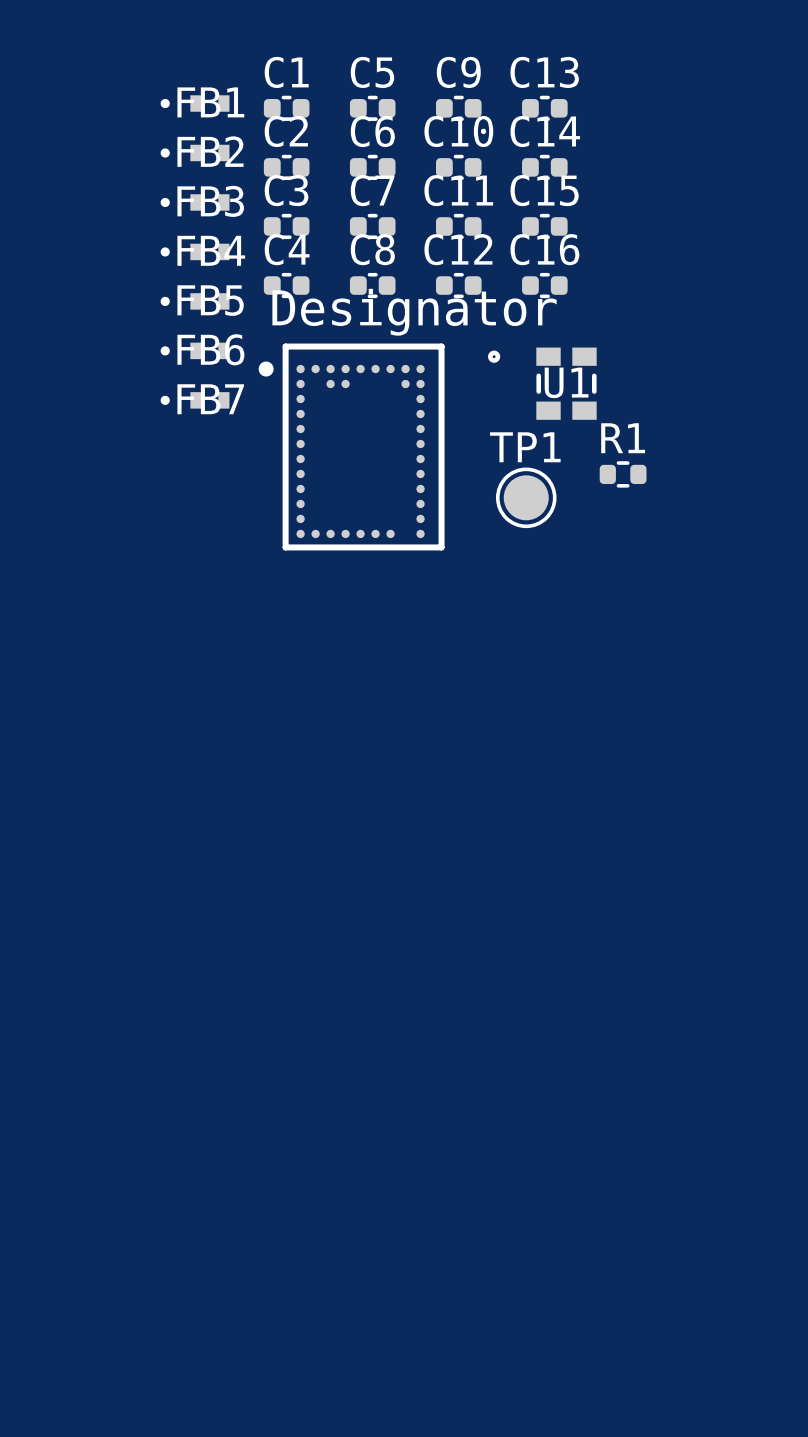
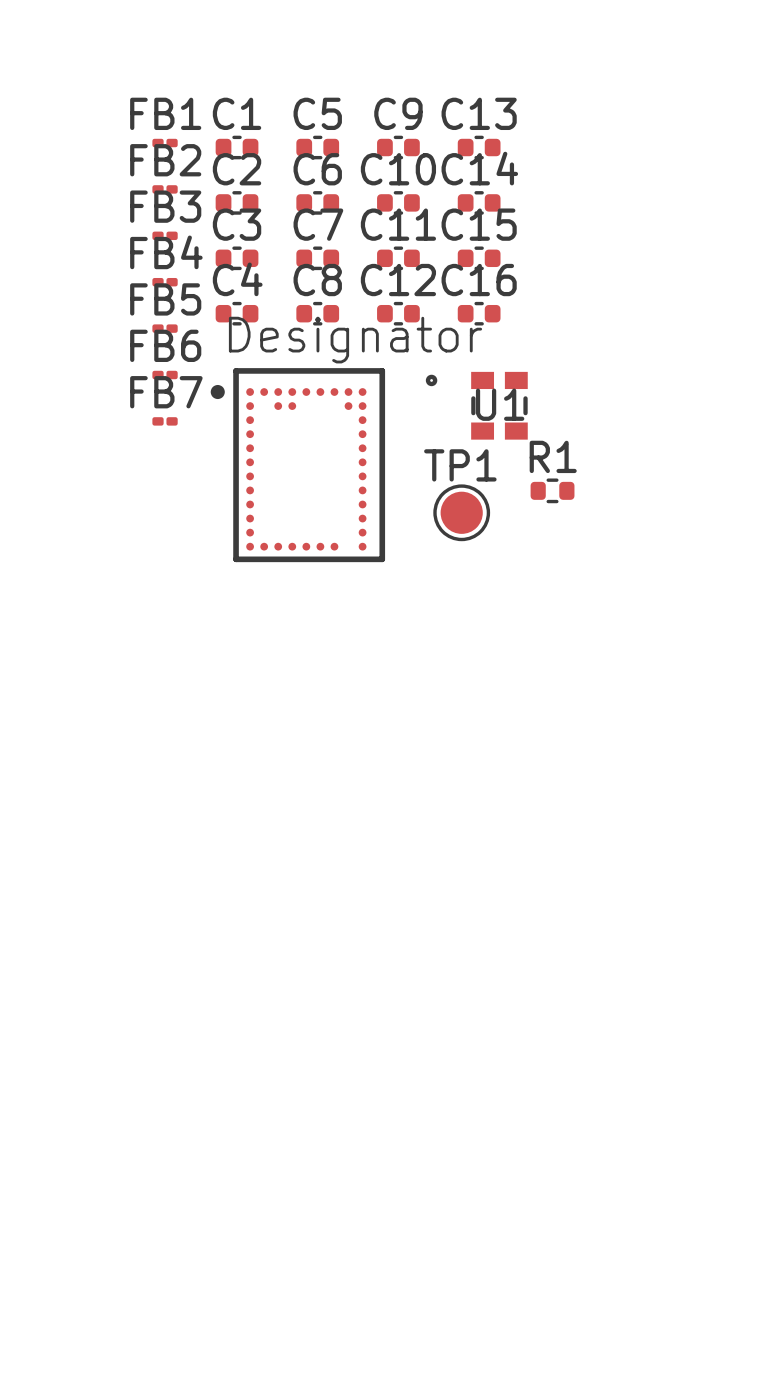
FB1 footprint: [160, 95, 230, 112] -> [152, 138, 178, 148]
FB2 footprint: [160, 144, 230, 162] -> [152, 185, 178, 194]
FB3 footprint: [160, 194, 230, 211] -> [152, 231, 178, 241]
FB4 footprint: [160, 243, 230, 261] -> [152, 277, 178, 287]
FB5 footprint: [160, 293, 230, 310] -> [152, 324, 178, 333]
FB6 footprint: [160, 342, 230, 360] -> [152, 370, 178, 380]
FB7 footprint: [160, 392, 230, 409] -> [152, 417, 178, 426]

